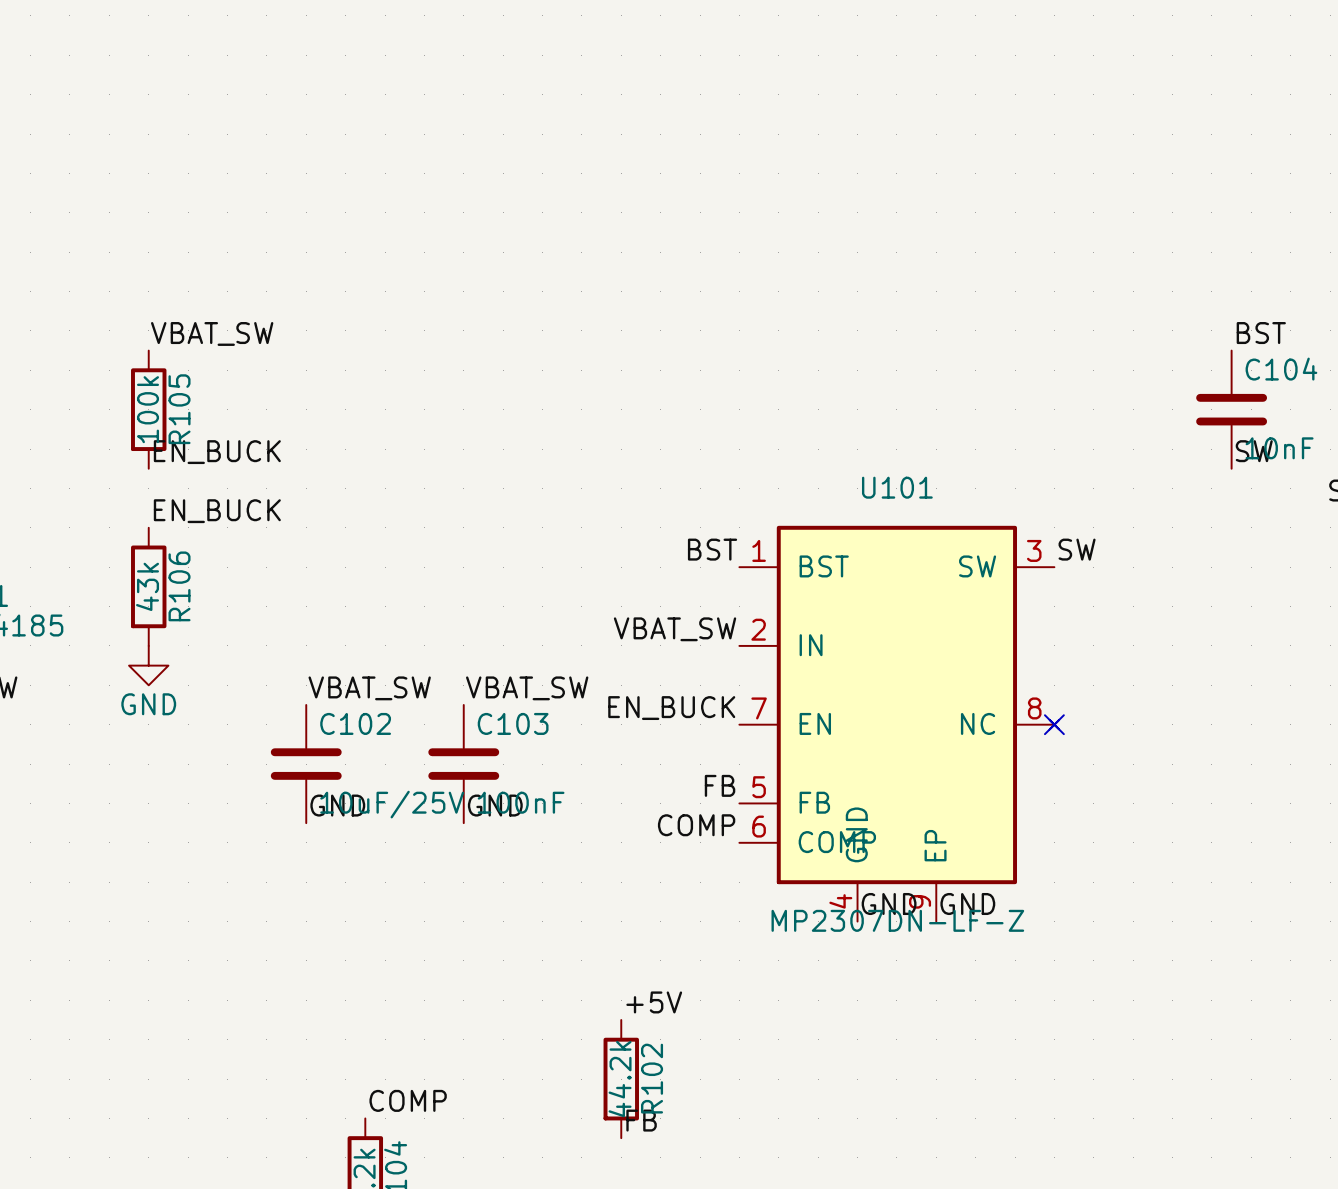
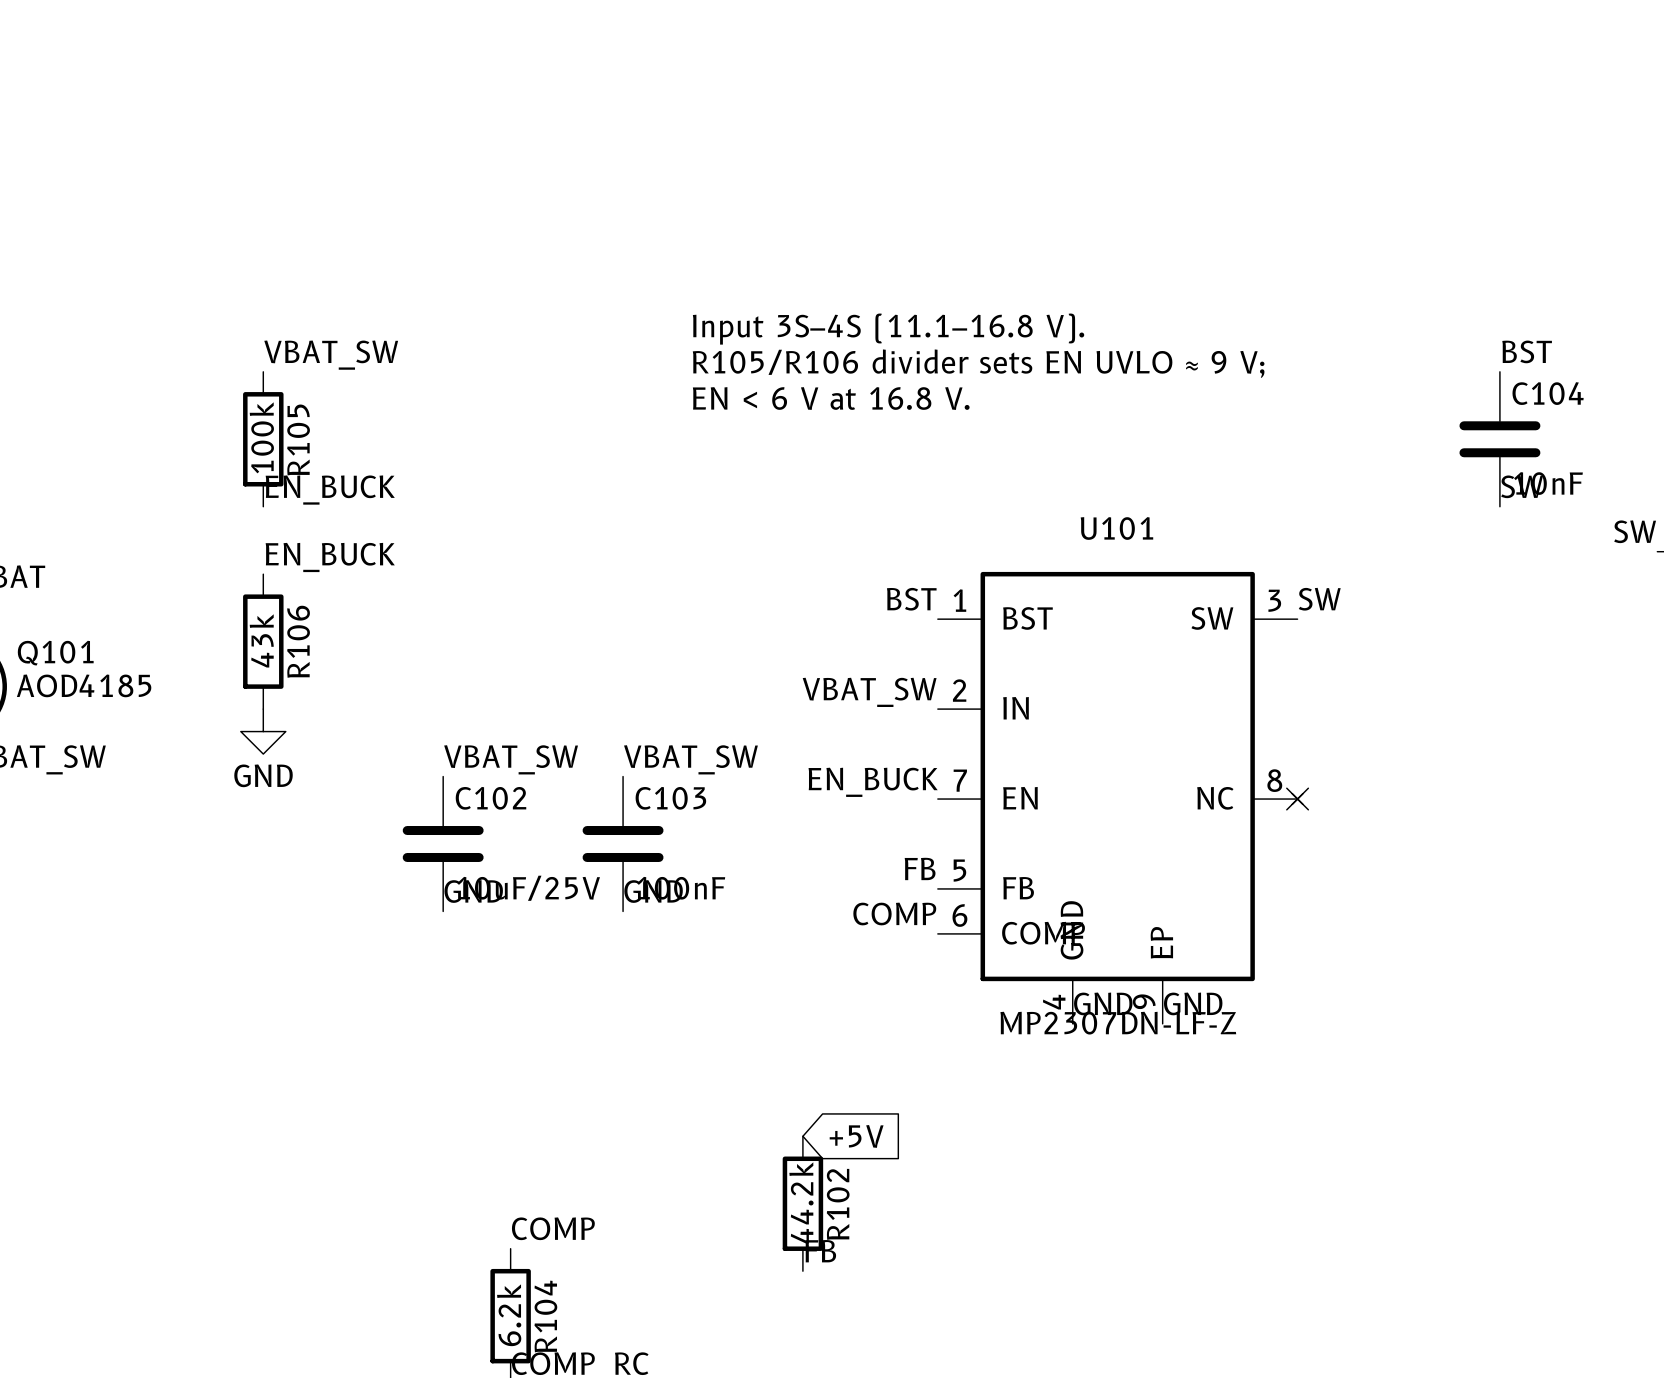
text: none -> Input 3S–4S (11.1–16.8 V). (888, 329)
text: none -> R105/R106 divider sets EN UVLO ≈ 9 V; (978, 363)
text: none -> EN < 6 V at 16.8 V. (831, 398)
label: +5V (654, 1002) -> none
global label: none -> +5V (856, 1136)

